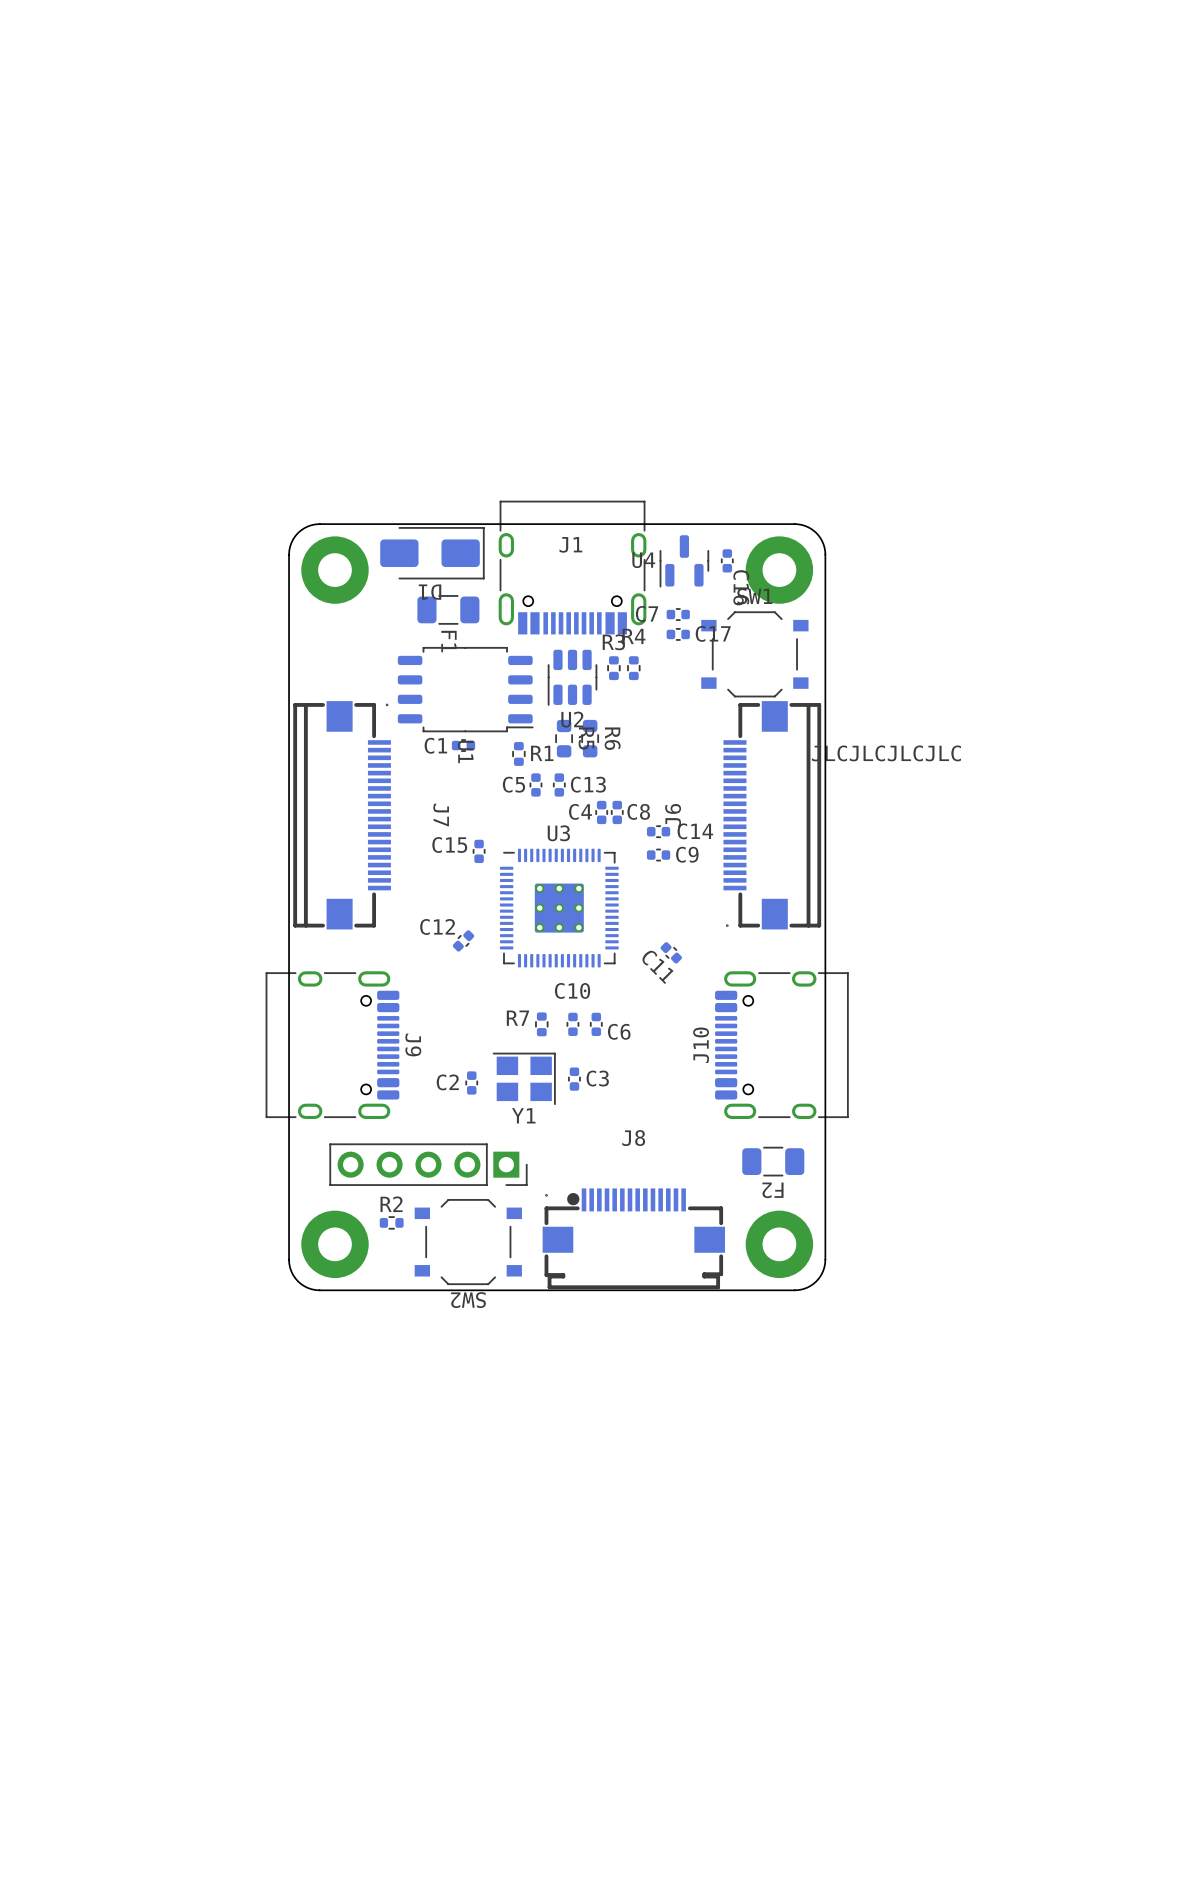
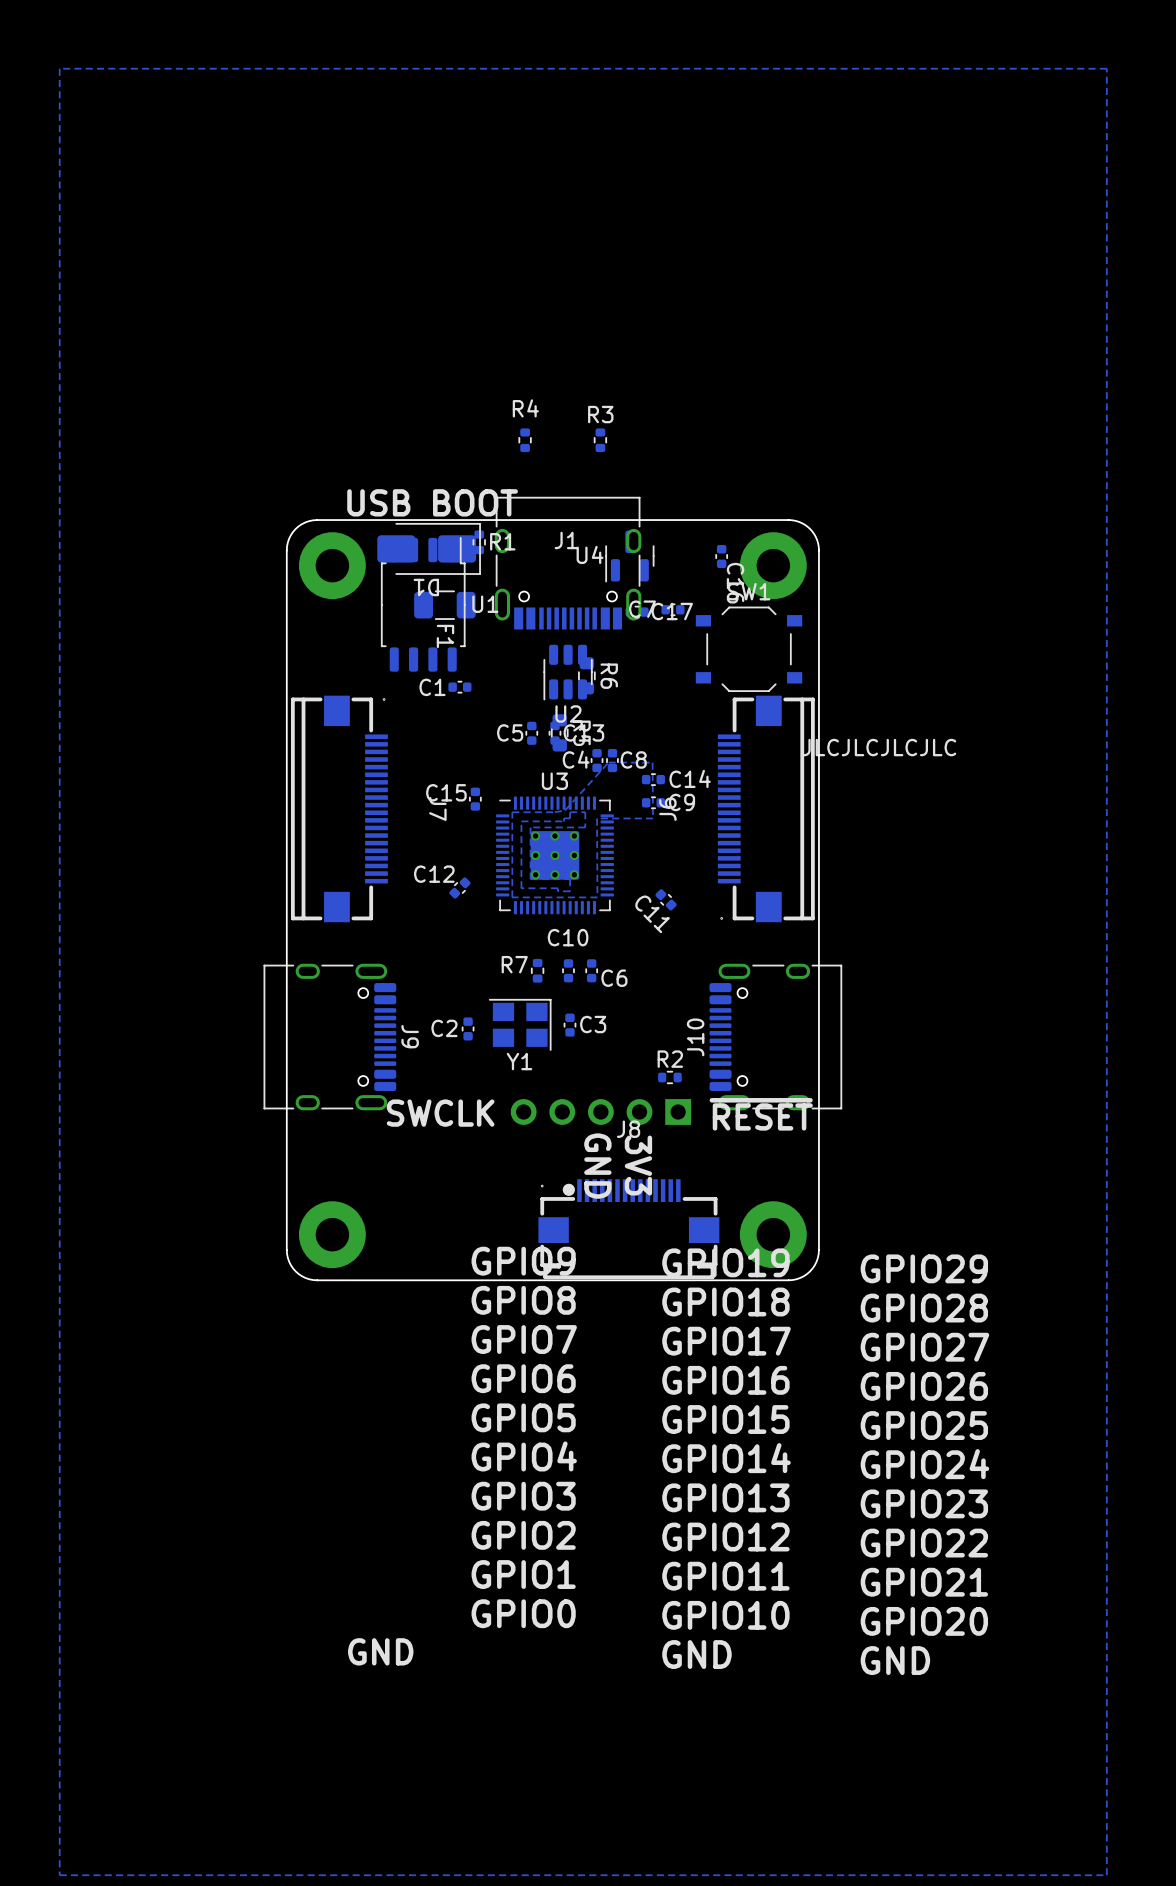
bottom zone outline: none -> (1106, 68) (1106, 1875) (59, 1875) (59, 68) (1106, 68)
text: none -> USB BOOT (432, 502)
U4 position: (684, 561) -> (629, 556)
C17 position: (678, 634) -> (637, 612)
R3 position: (613, 668) -> (600, 440)
R4 position: (633, 668) -> (525, 440)
U1 rotation: 0° (465, 689) -> 90° counterclockwise (423, 604)
U1 position: (465, 689) -> (423, 604)
R6 position: (590, 738) -> (586, 675)
C1 position: (463, 745) -> (459, 687)
R1 position: (518, 753) -> (479, 542)
bottom zone outline: none -> (608, 762) (565, 810) (512, 812) (512, 897) (597, 897) (597, 818) (653, 818) (652, 762) (608, 762)
C5 position: (535, 784) -> (531, 733)
C13 position: (559, 784) -> (554, 733)
C4 position: (601, 812) -> (597, 760)
C8 position: (617, 812) -> (612, 760)
bottom zone outline: none -> (585, 812) (570, 812) (570, 818) (564, 818) (564, 821) (521, 821) (521, 888) (557, 888) (557, 891) (570, 891) (570, 879) (530, 879) (530, 827) (585, 827) (585, 812)
C14 position: (658, 831) -> (653, 779)
C15 position: (479, 851) -> (475, 799)
C9 position: (658, 855) -> (653, 802)
U3 position: (559, 908) -> (554, 855)
C12 position: (463, 940) -> (459, 887)
C11 position: (671, 952) -> (666, 899)
R7 position: (541, 1024) -> (537, 970)
C10 position: (572, 1024) -> (568, 970)
C6 position: (596, 1024) -> (591, 970)
Y1 position: (524, 1078) -> (520, 1024)
C3 position: (574, 1079) -> (569, 1025)
C2 position: (471, 1082) -> (468, 1028)
text: none -> SWCLK (440, 1113)
text: none -> ~{RESET} (761, 1114)
F2: (773, 1161) -> none
part side: bottom (428, 1164) -> top (600, 1112)
text: none -> GND (597, 1166)
text: none -> 3V3 (638, 1165)
R2 position: (391, 1222) -> (669, 1077)
SW2: (468, 1242) -> none
text: none -> GPIO9 (523, 1261)
text: none -> GPIO19 (725, 1262)
text: none -> GPIO29 (924, 1268)
text: none -> GPIO8 (523, 1300)
text: none -> GPIO18 (725, 1302)
text: none -> GPIO28 (924, 1308)
text: none -> GPIO7 (524, 1339)
text: none -> GPIO17 (726, 1341)
text: none -> GPIO27 (924, 1347)
text: none -> GPIO6 (523, 1378)
text: none -> GPIO16 (725, 1380)
text: none -> GPIO26 (924, 1386)
text: none -> GPIO5 (523, 1417)
text: none -> GPIO15 (725, 1419)
text: none -> GPIO25 (924, 1425)
text: none -> GPIO4 (524, 1456)
text: none -> GPIO14 (726, 1458)
text: none -> GPIO24 (924, 1464)
text: none -> GPIO3 (523, 1496)
text: none -> GPIO13 (725, 1497)
text: none -> GPIO23 (924, 1503)
text: none -> GPIO2 (523, 1535)
text: none -> GPIO12 (725, 1537)
text: none -> GPIO22 (924, 1543)
text: none -> GPIO1 (523, 1574)
text: none -> GPIO11 (725, 1576)
text: none -> GPIO21 (924, 1582)
text: none -> GPIO0 (523, 1613)
text: none -> GPIO10 (725, 1615)
text: none -> GPIO20 (924, 1621)
text: none -> GND (380, 1651)
text: none -> GND (696, 1654)
text: none -> GND (895, 1660)

